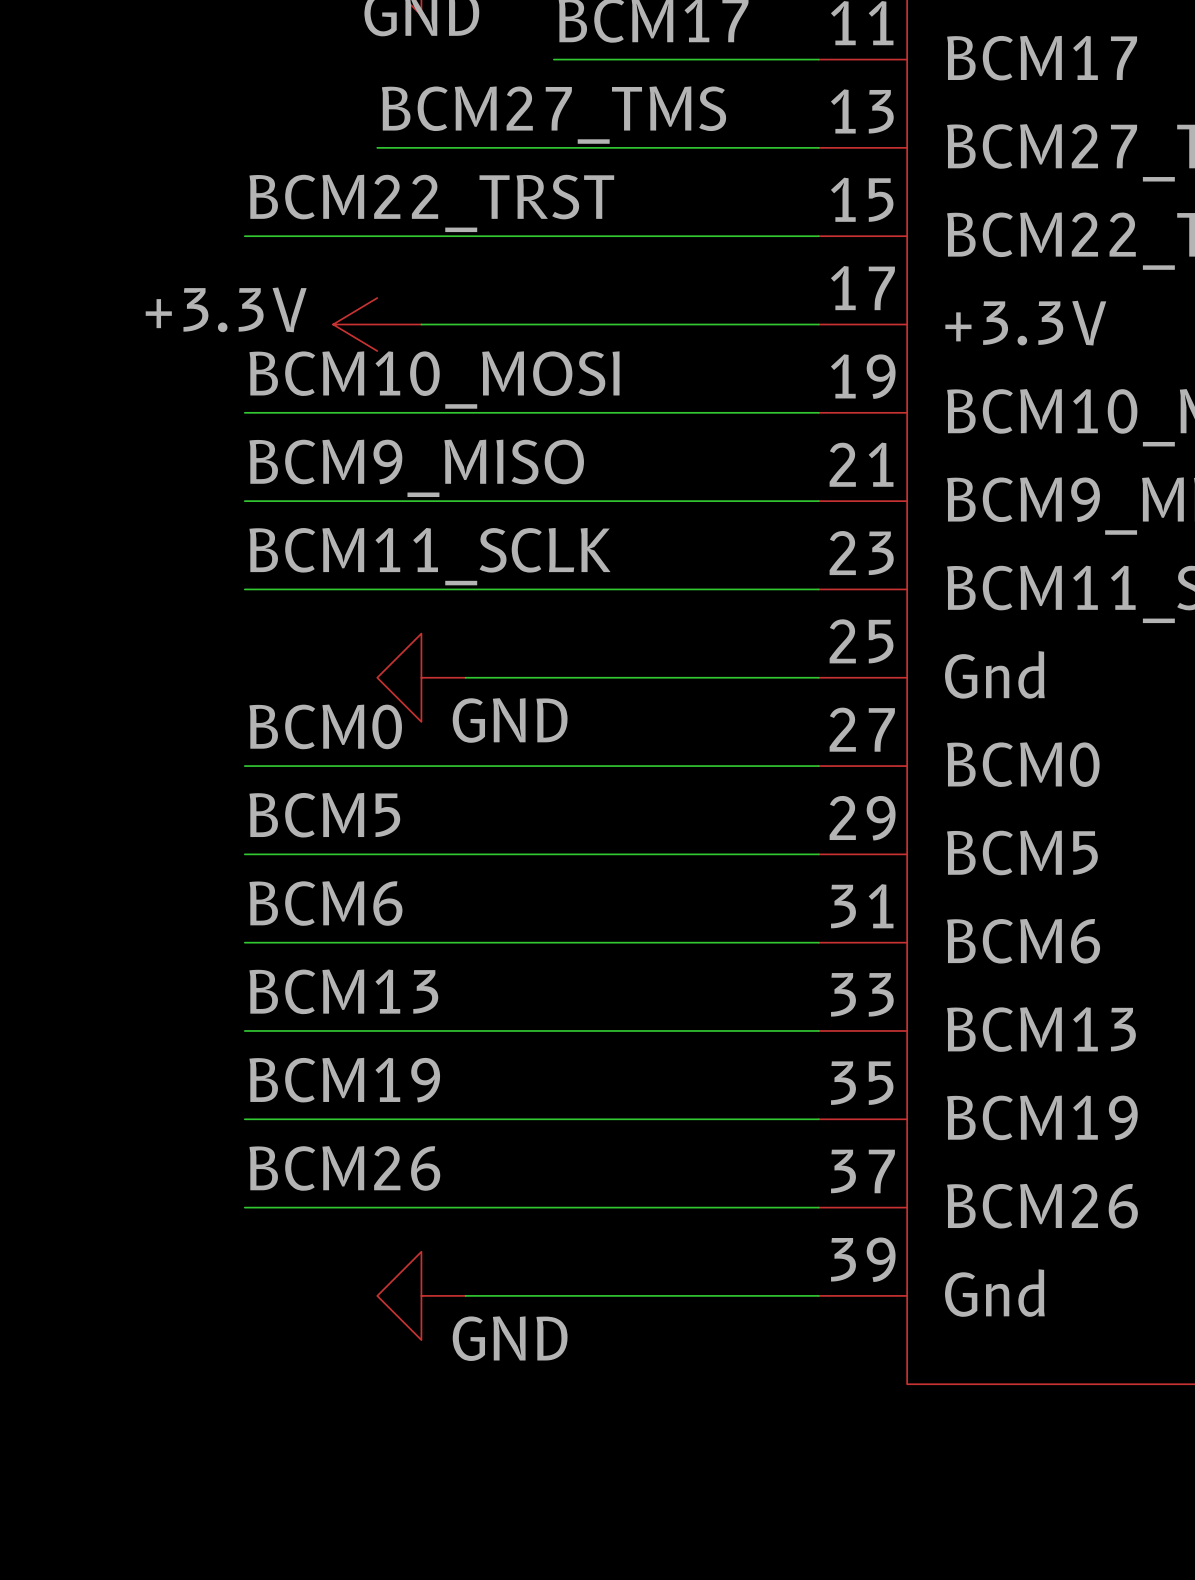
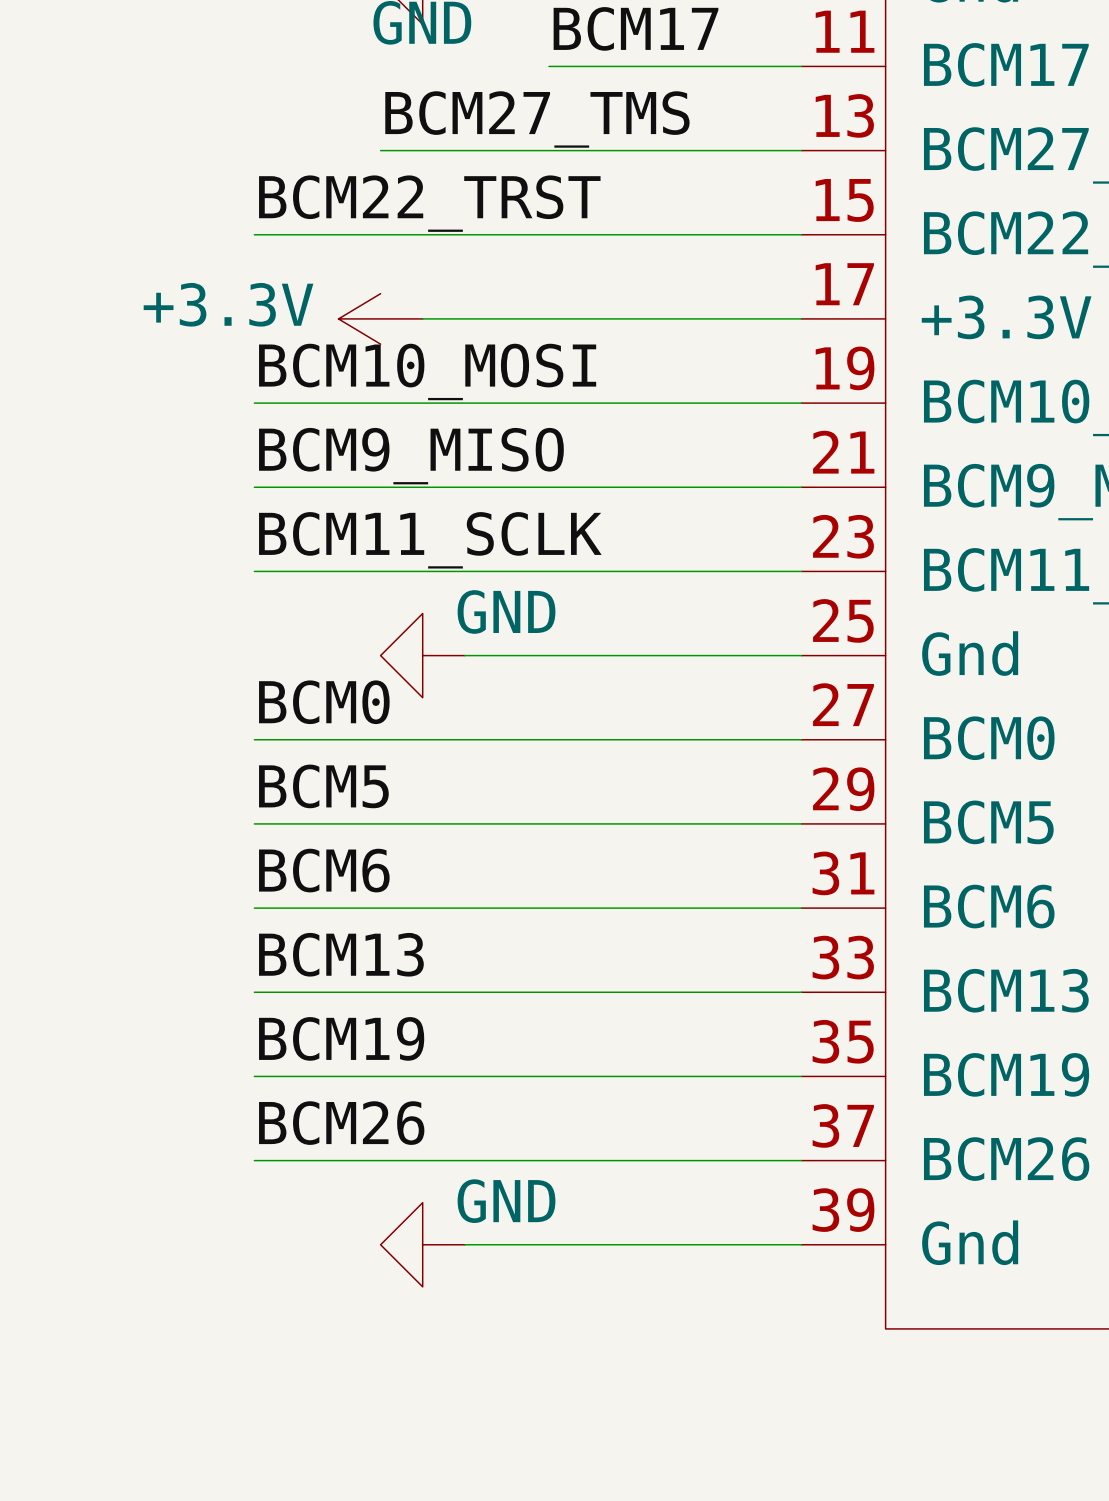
power symbol text position: GND (510, 720) -> GND (506, 611)
power symbol text position: GND (510, 1338) -> GND (506, 1201)

